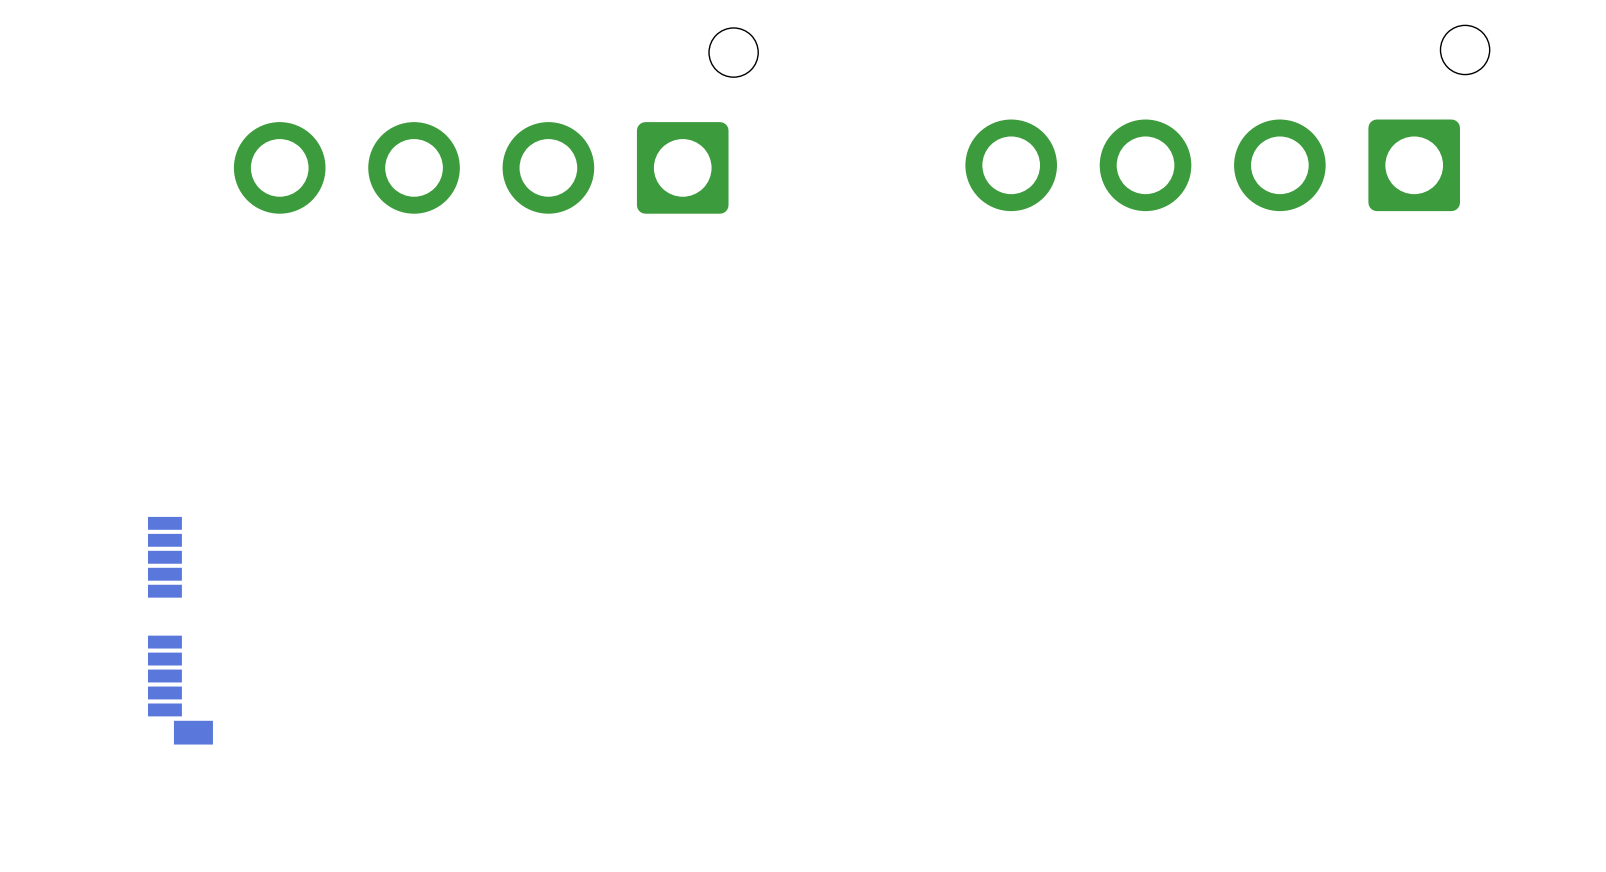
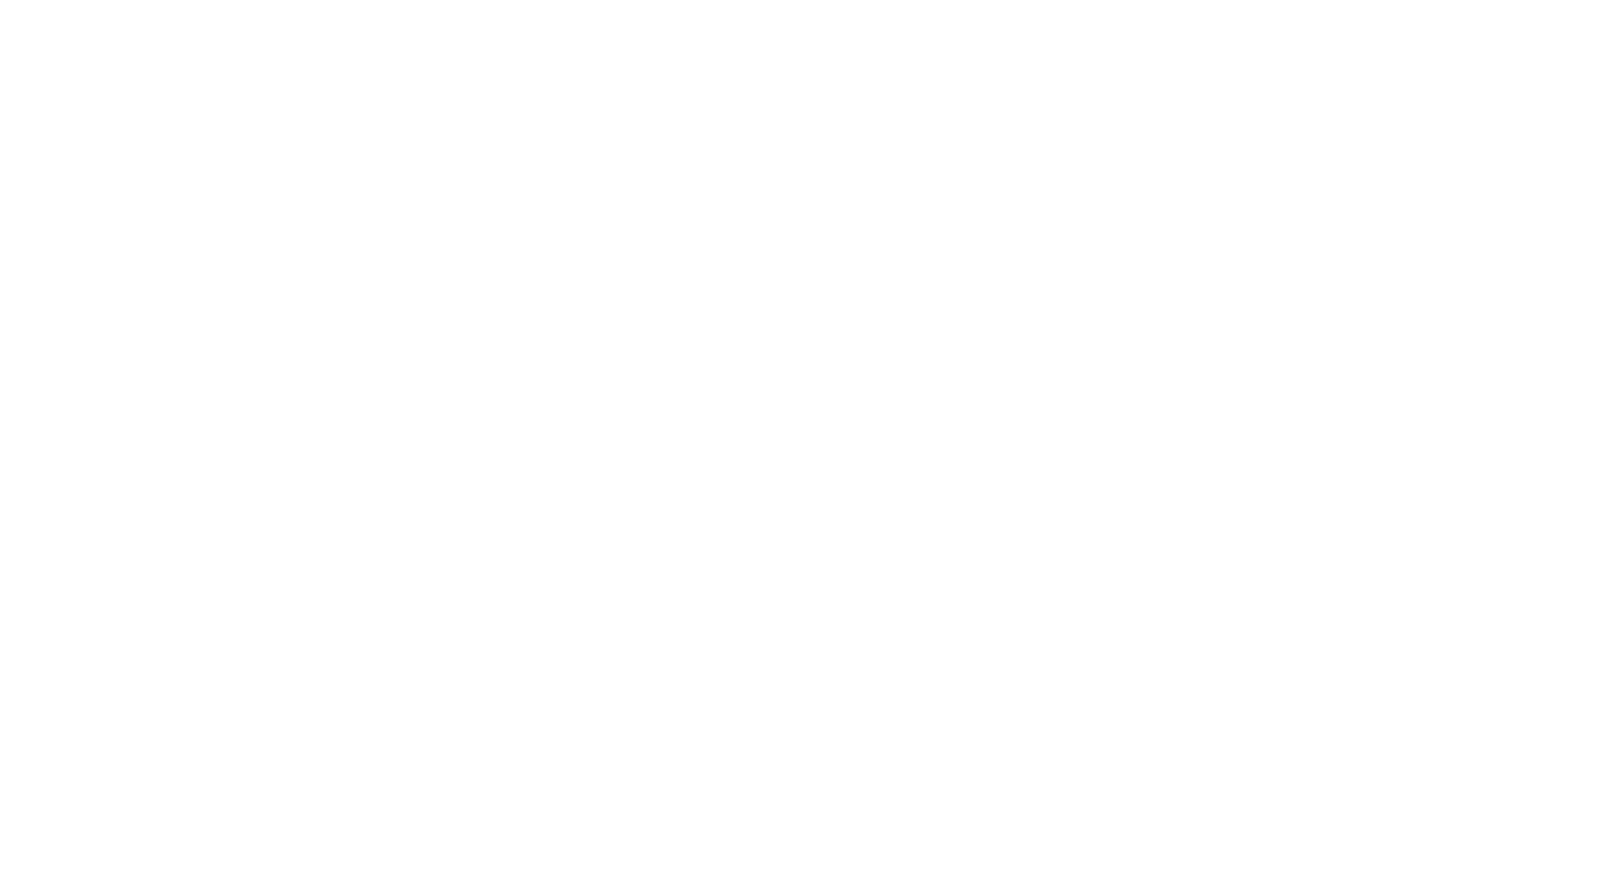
part: (1227, 118) -> none
part: (496, 120) -> none
part: (180, 630) -> none

